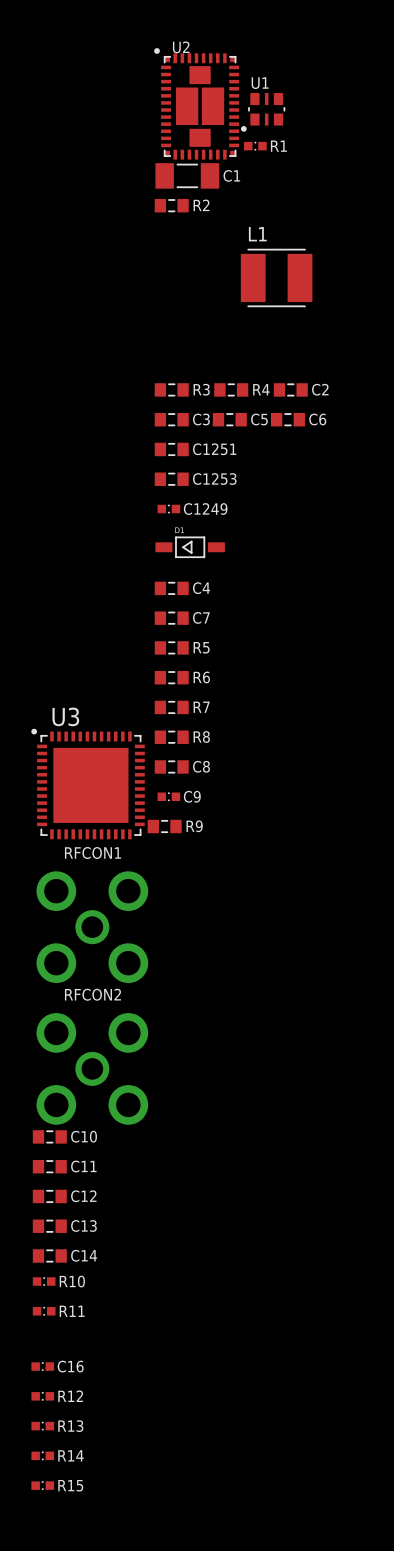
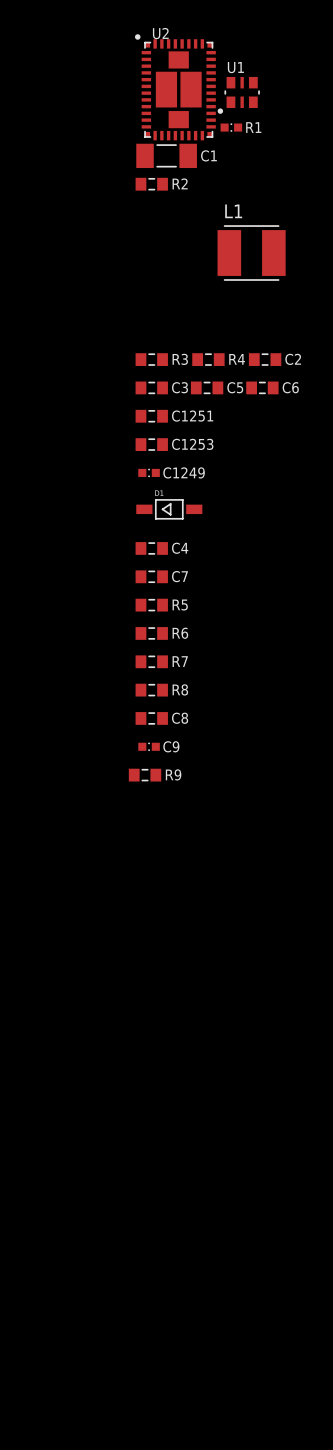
U3: (88, 784) -> none
RFCON1: (92, 927) -> none
RFCON2: (92, 1068) -> none
C10: (49, 1136) -> none
C11: (49, 1166) -> none
C12: (49, 1196) -> none
C13: (49, 1226) -> none
C14: (49, 1256) -> none
R10: (44, 1281) -> none
R11: (44, 1311) -> none
C16: (42, 1366) -> none
R12: (42, 1396) -> none
R13: (42, 1426) -> none
R14: (42, 1455) -> none
R15: (42, 1485) -> none

